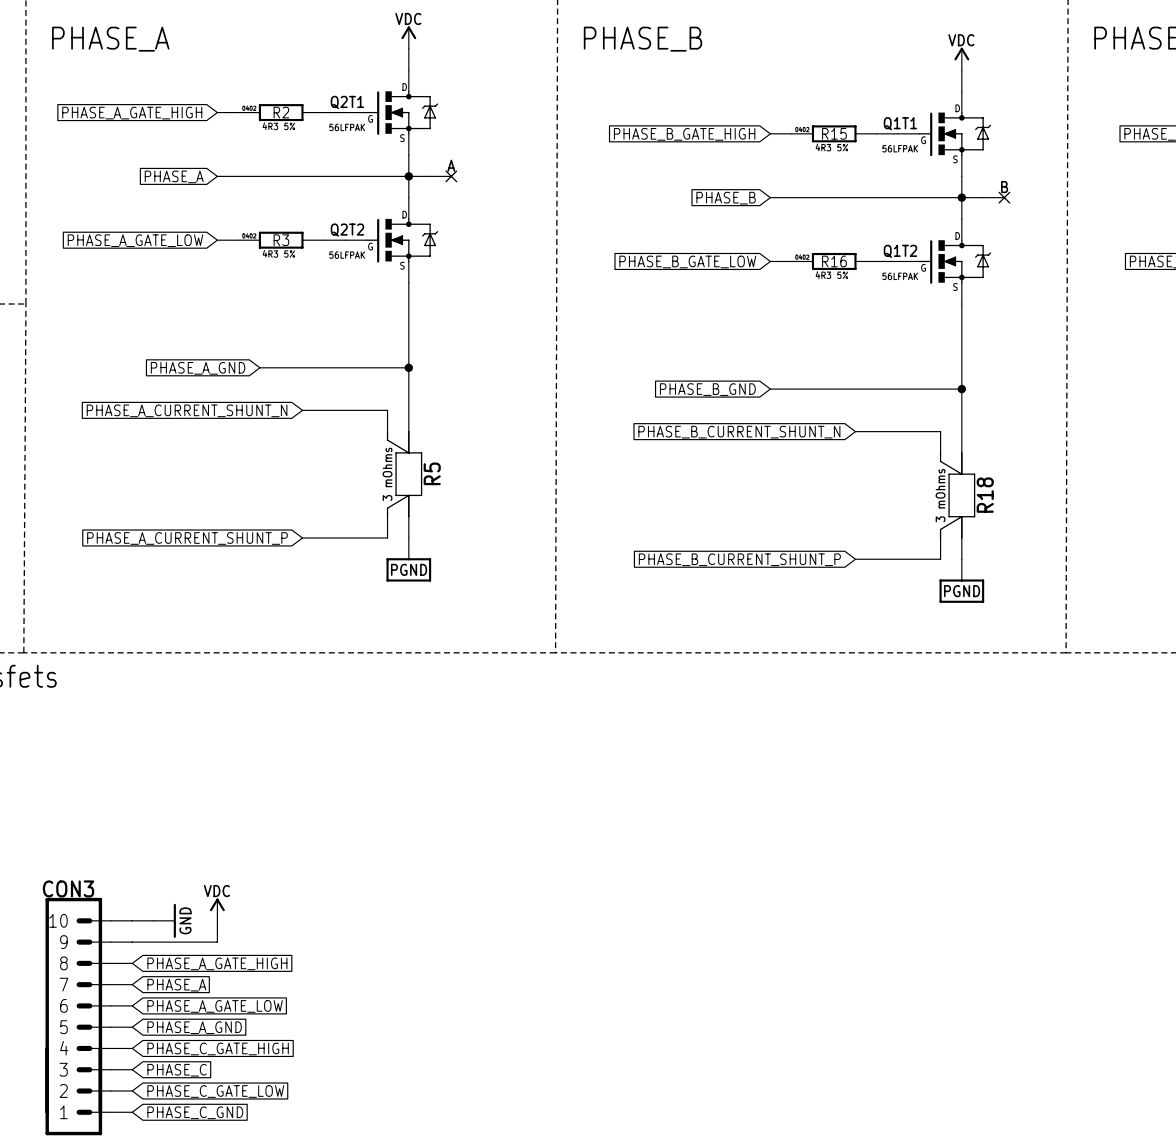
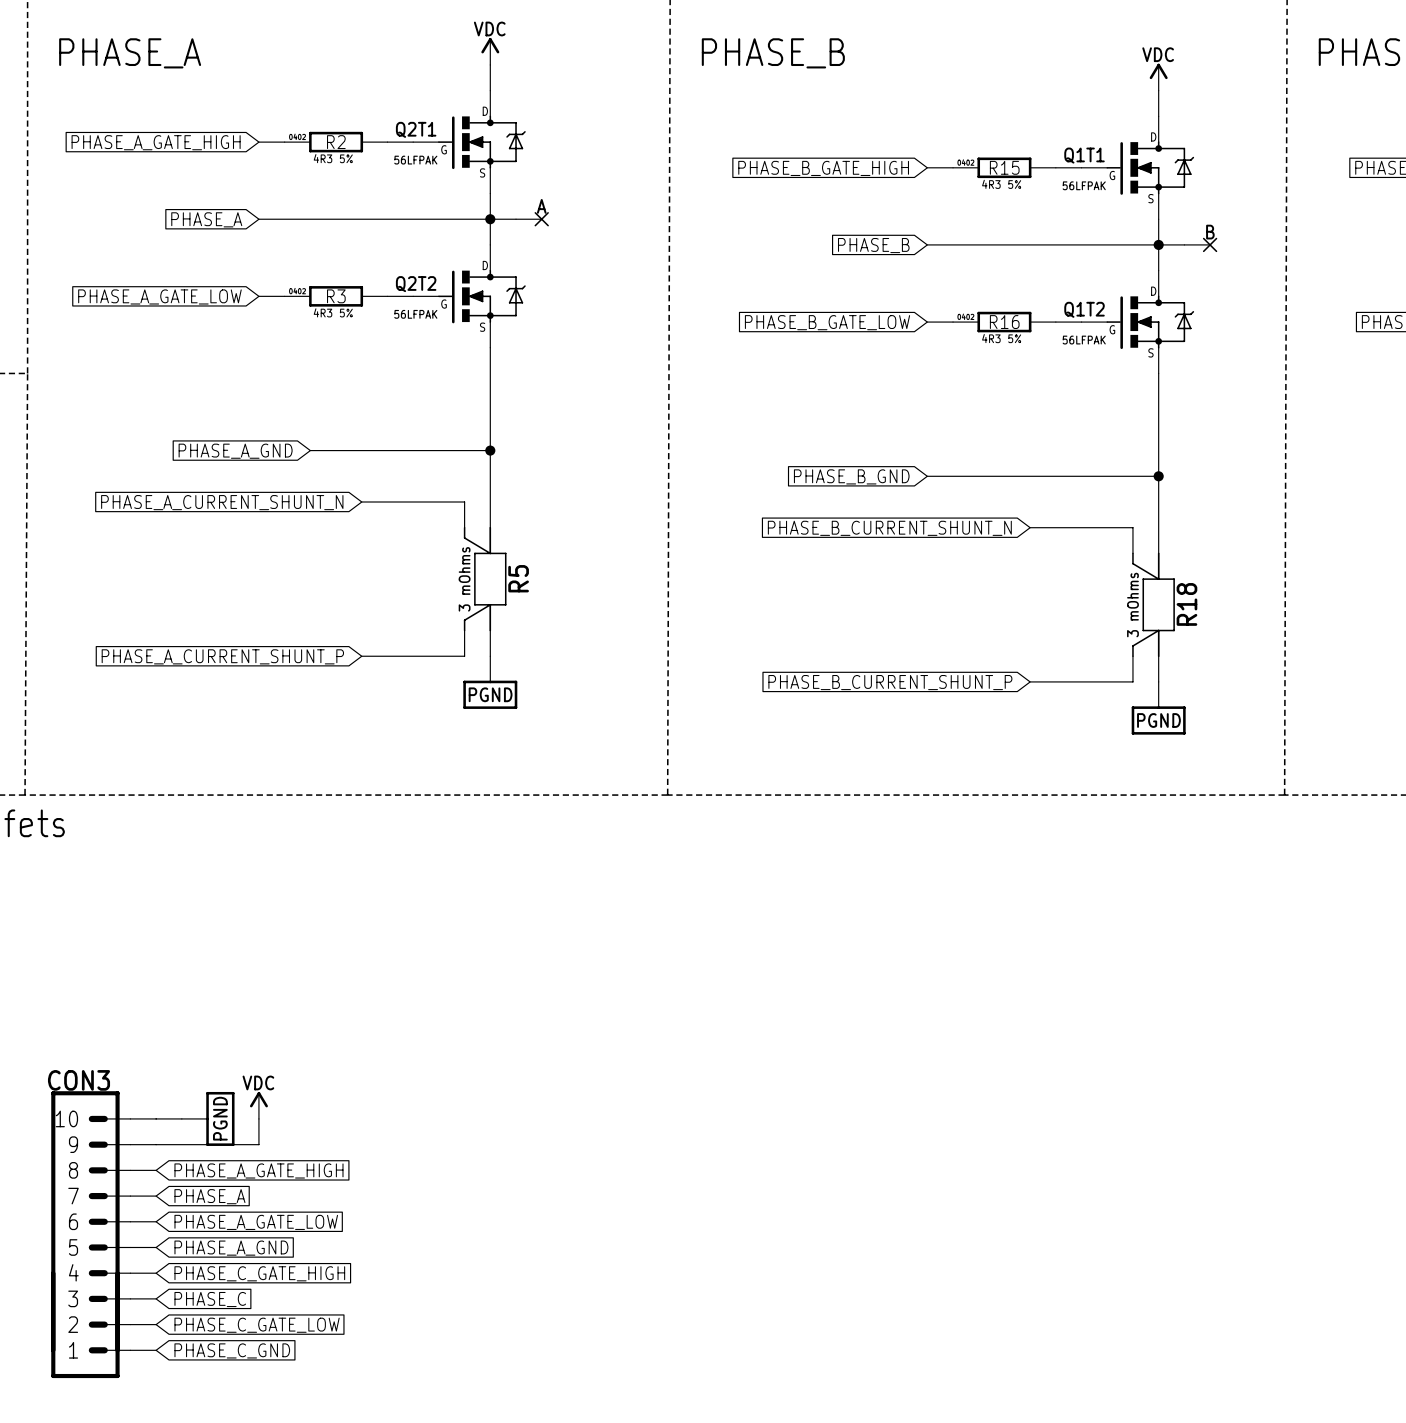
power symbol: GND (164, 920) -> none
power symbol: none -> PGND (208, 1118)

